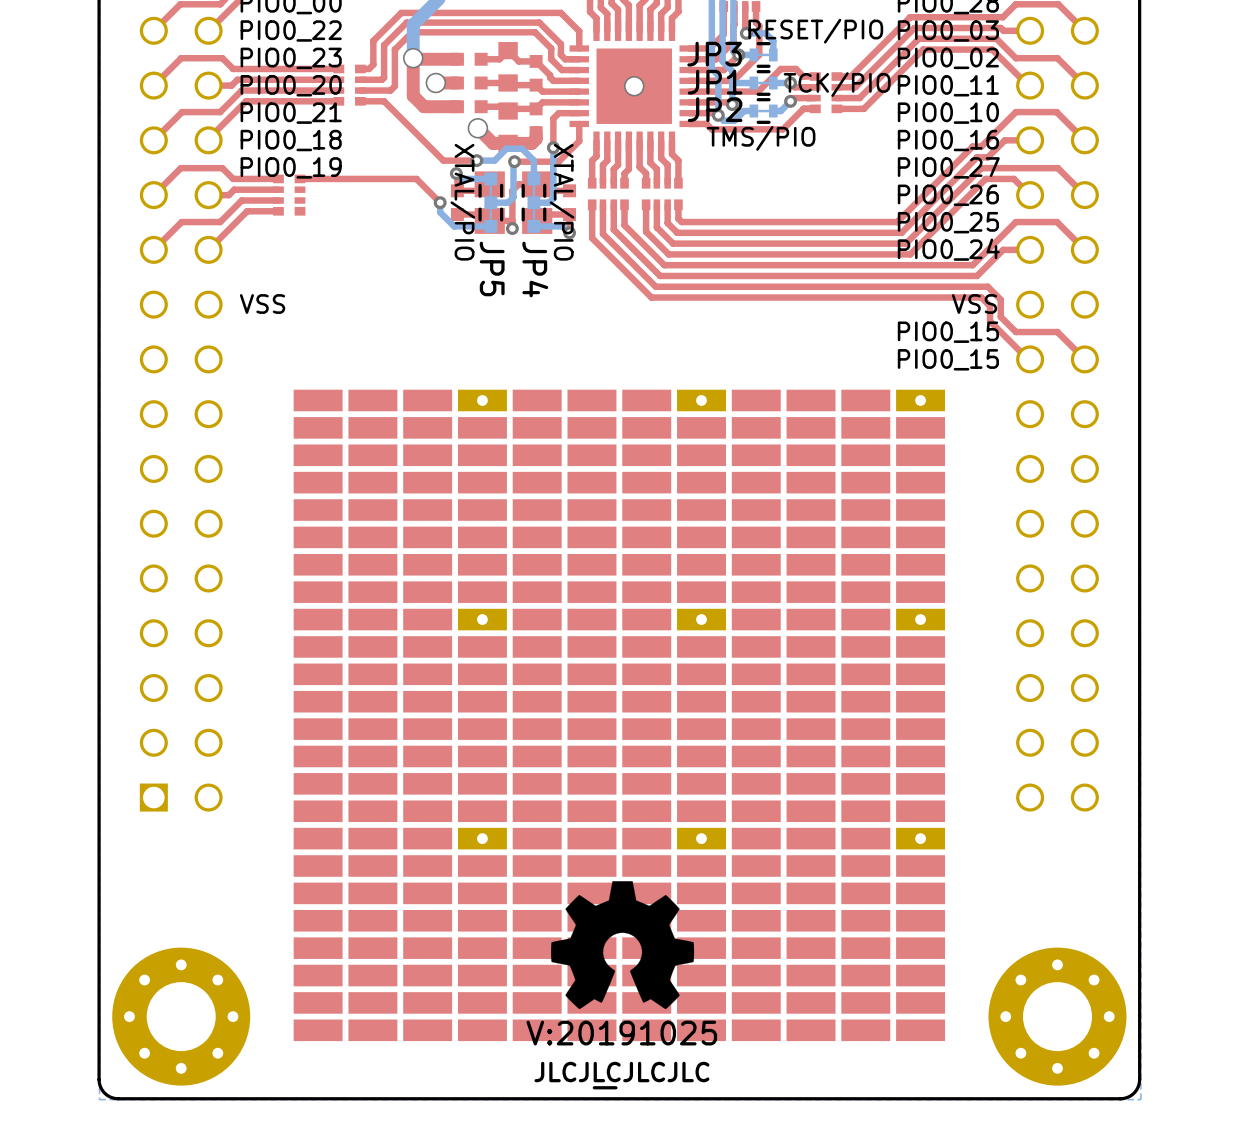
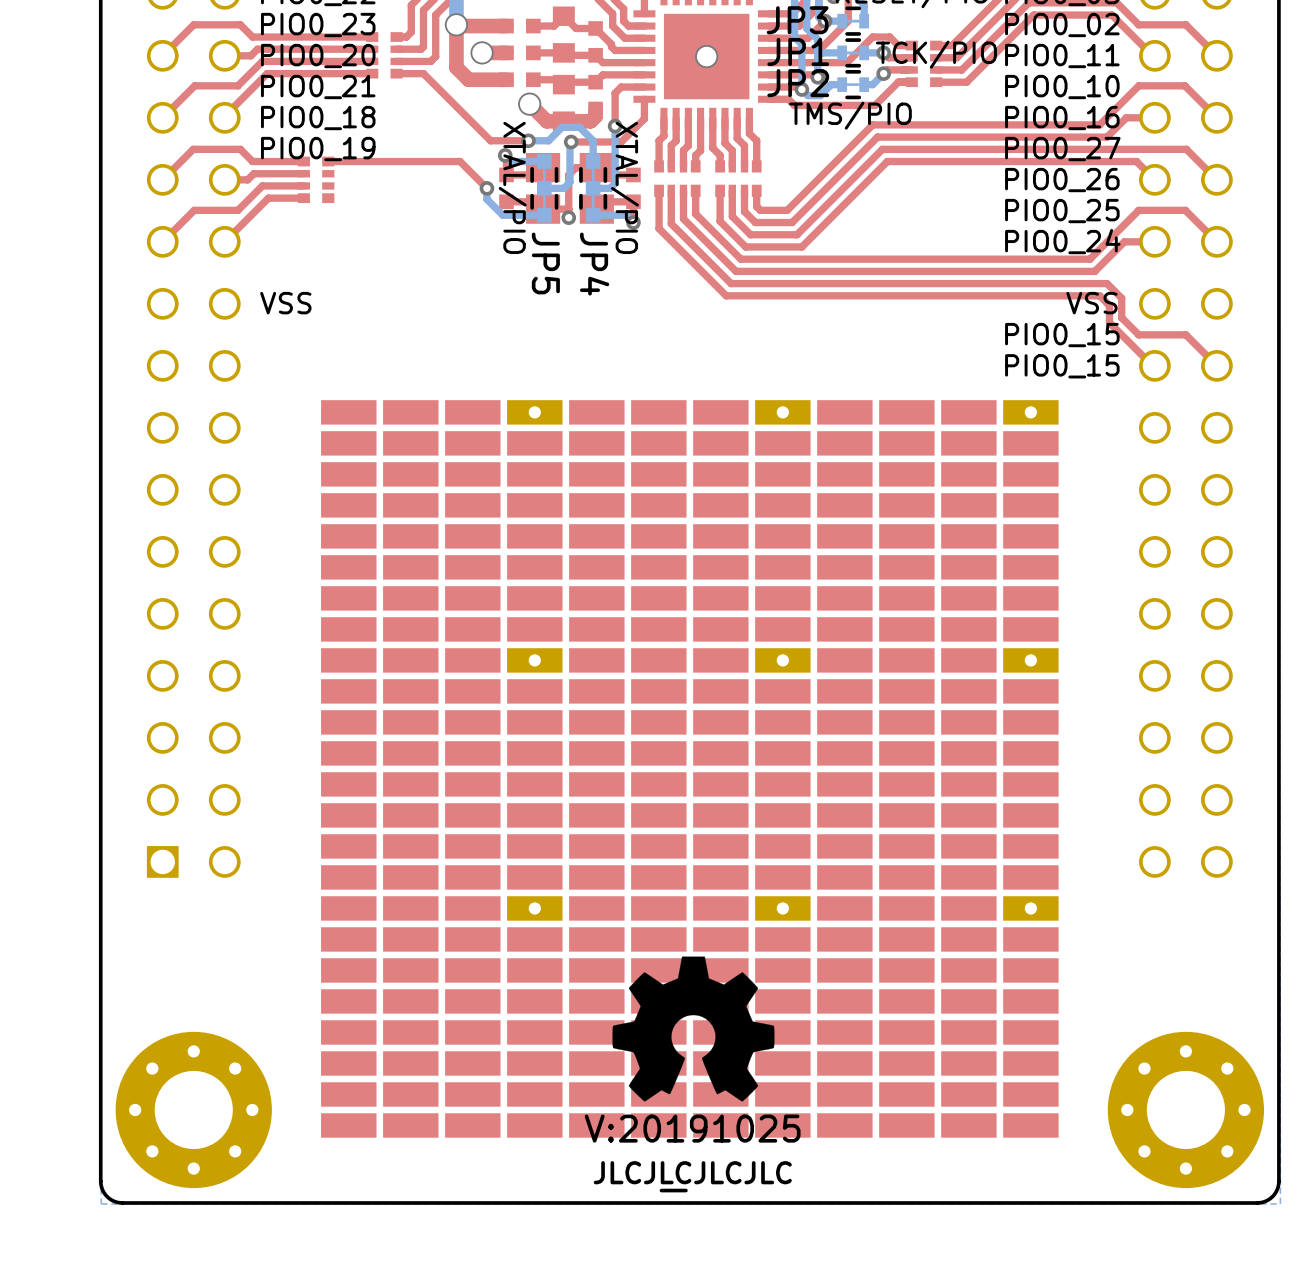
top track: (972, 146) (897, 222) (705, 222) -> (1089, 124) (872, 124) (787, 210)
top track: (977, 157) (901, 232) (709, 232) -> (1094, 137) (877, 137) (792, 222)
top track: (981, 168) (905, 243) (714, 243) -> (1099, 149) (882, 149) (797, 234)
top track: (985, 178) (910, 254) (718, 254) -> (1104, 161) (887, 161) (801, 246)

